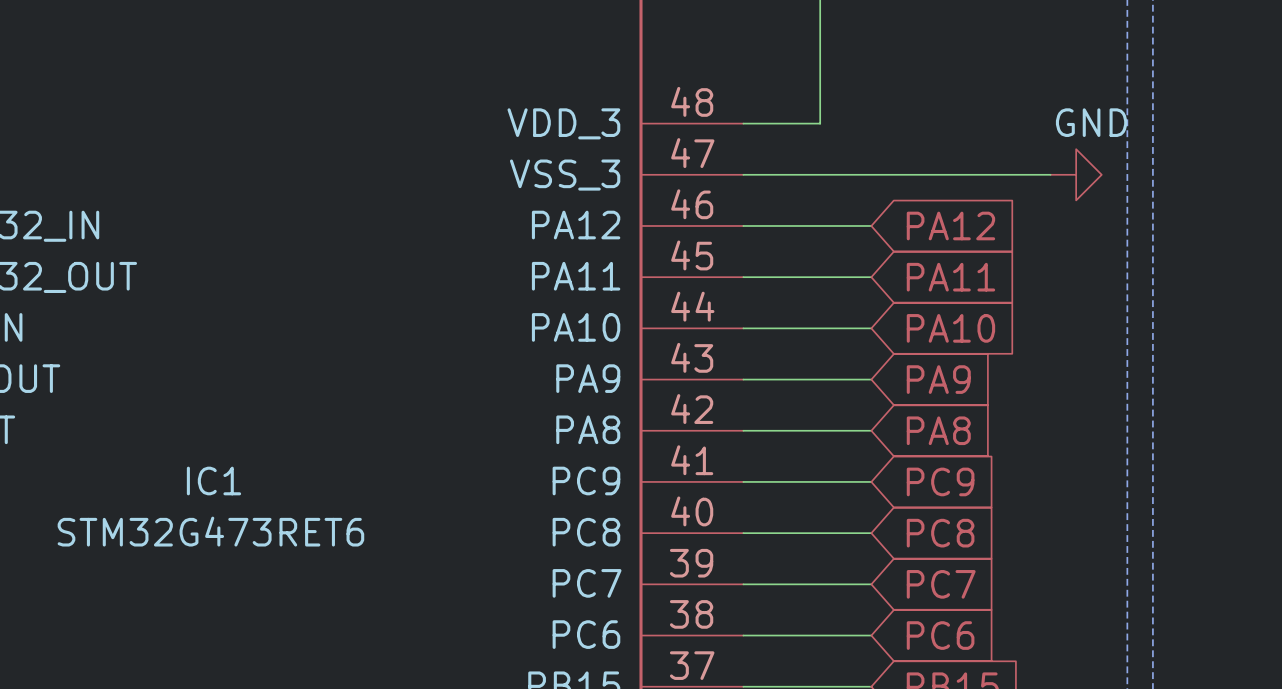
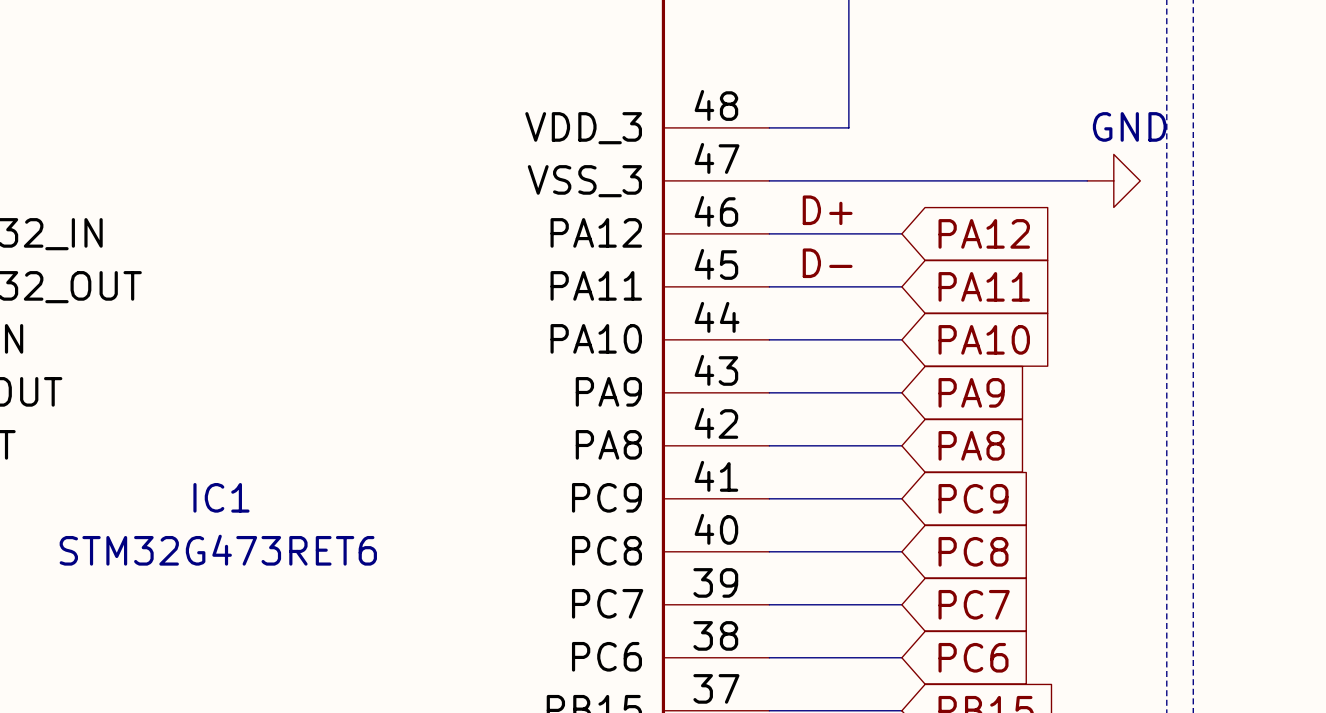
label: none -> D+ (827, 210)
label: none -> D- (827, 263)

